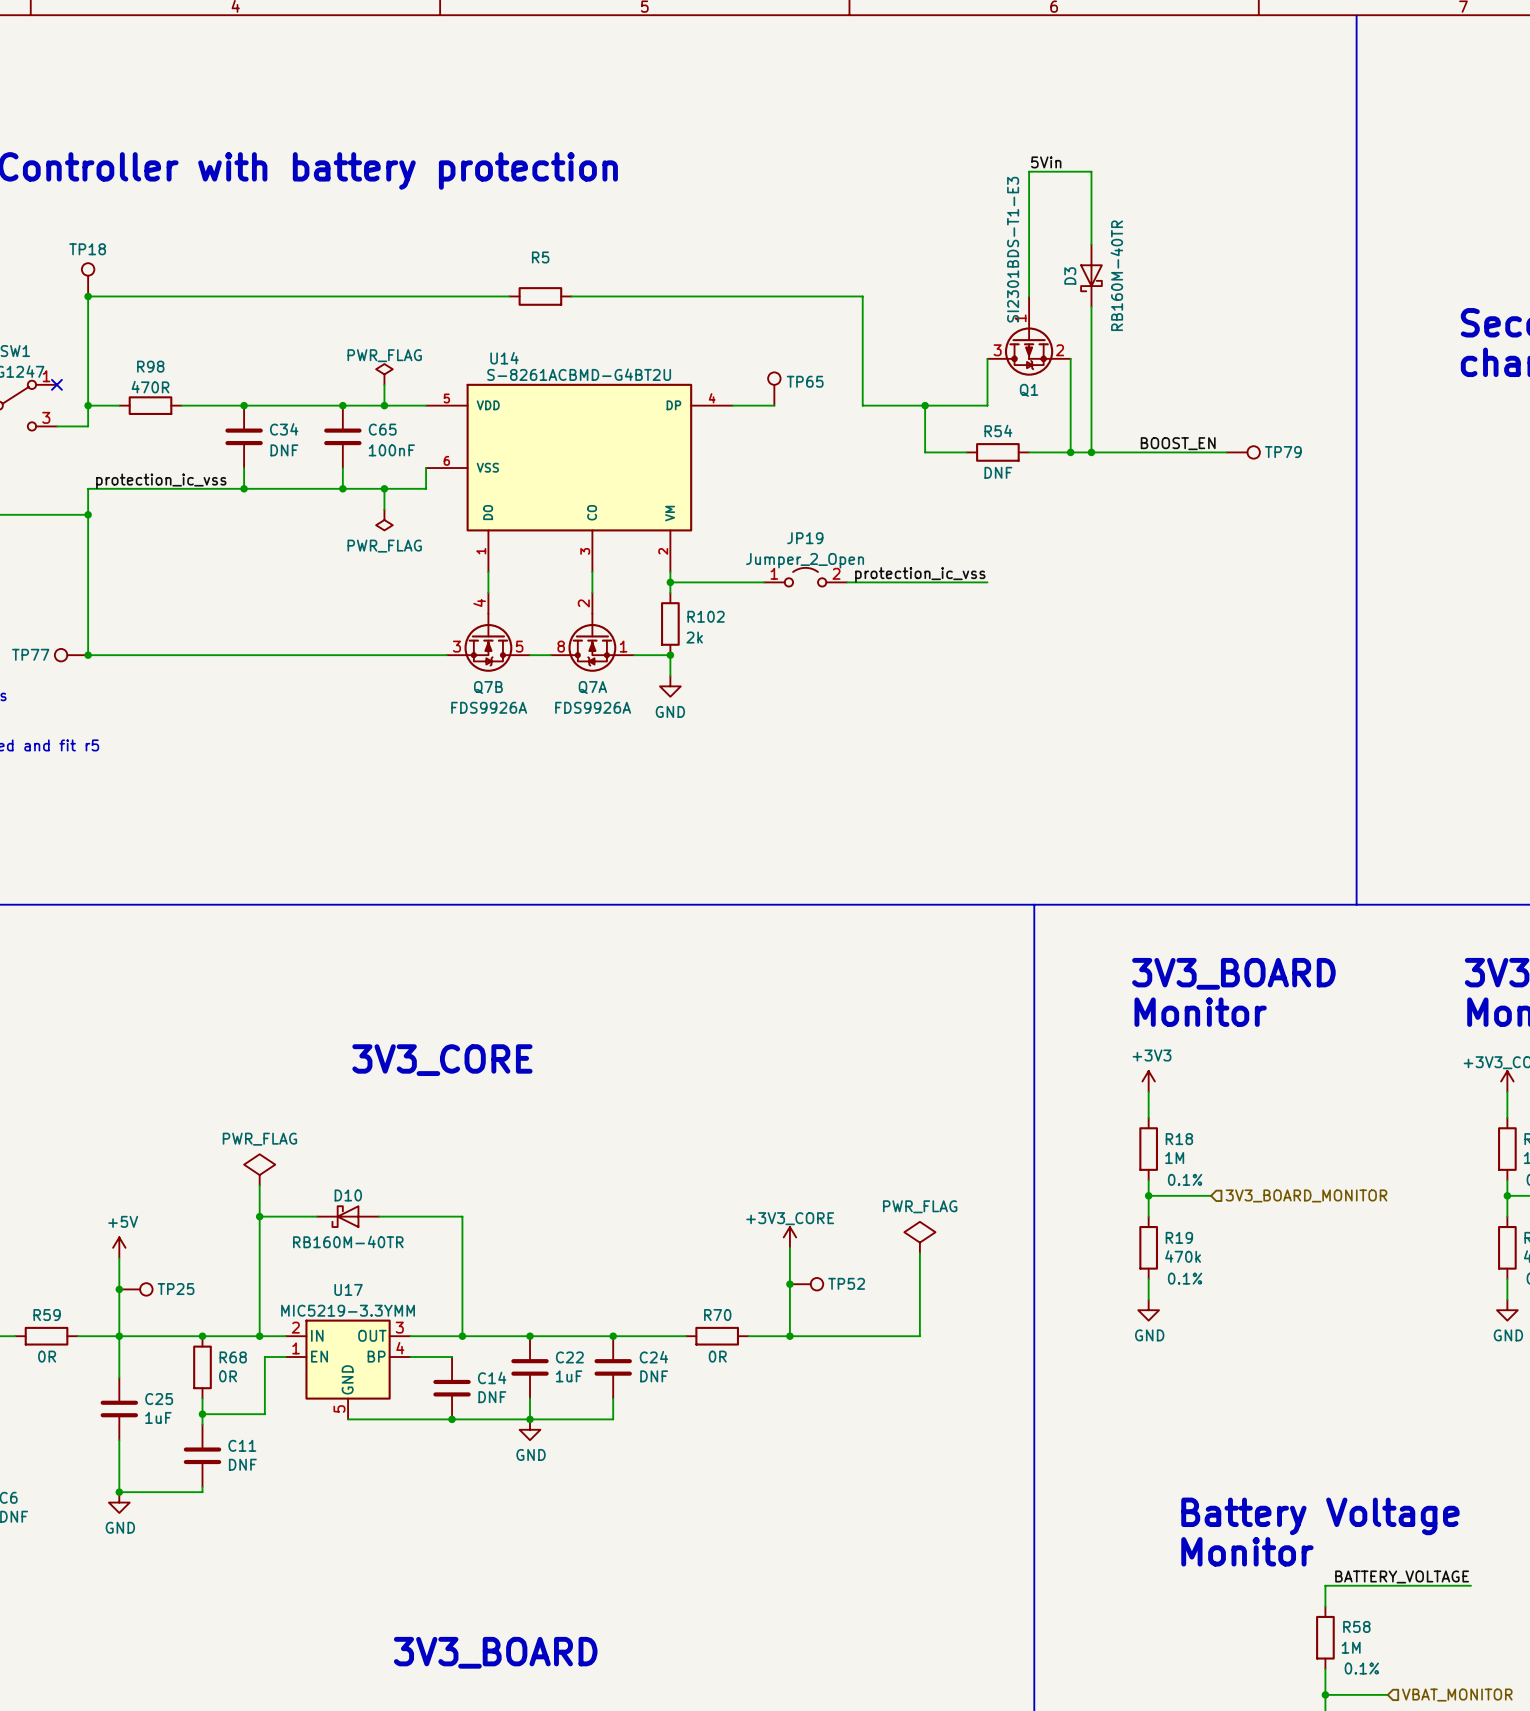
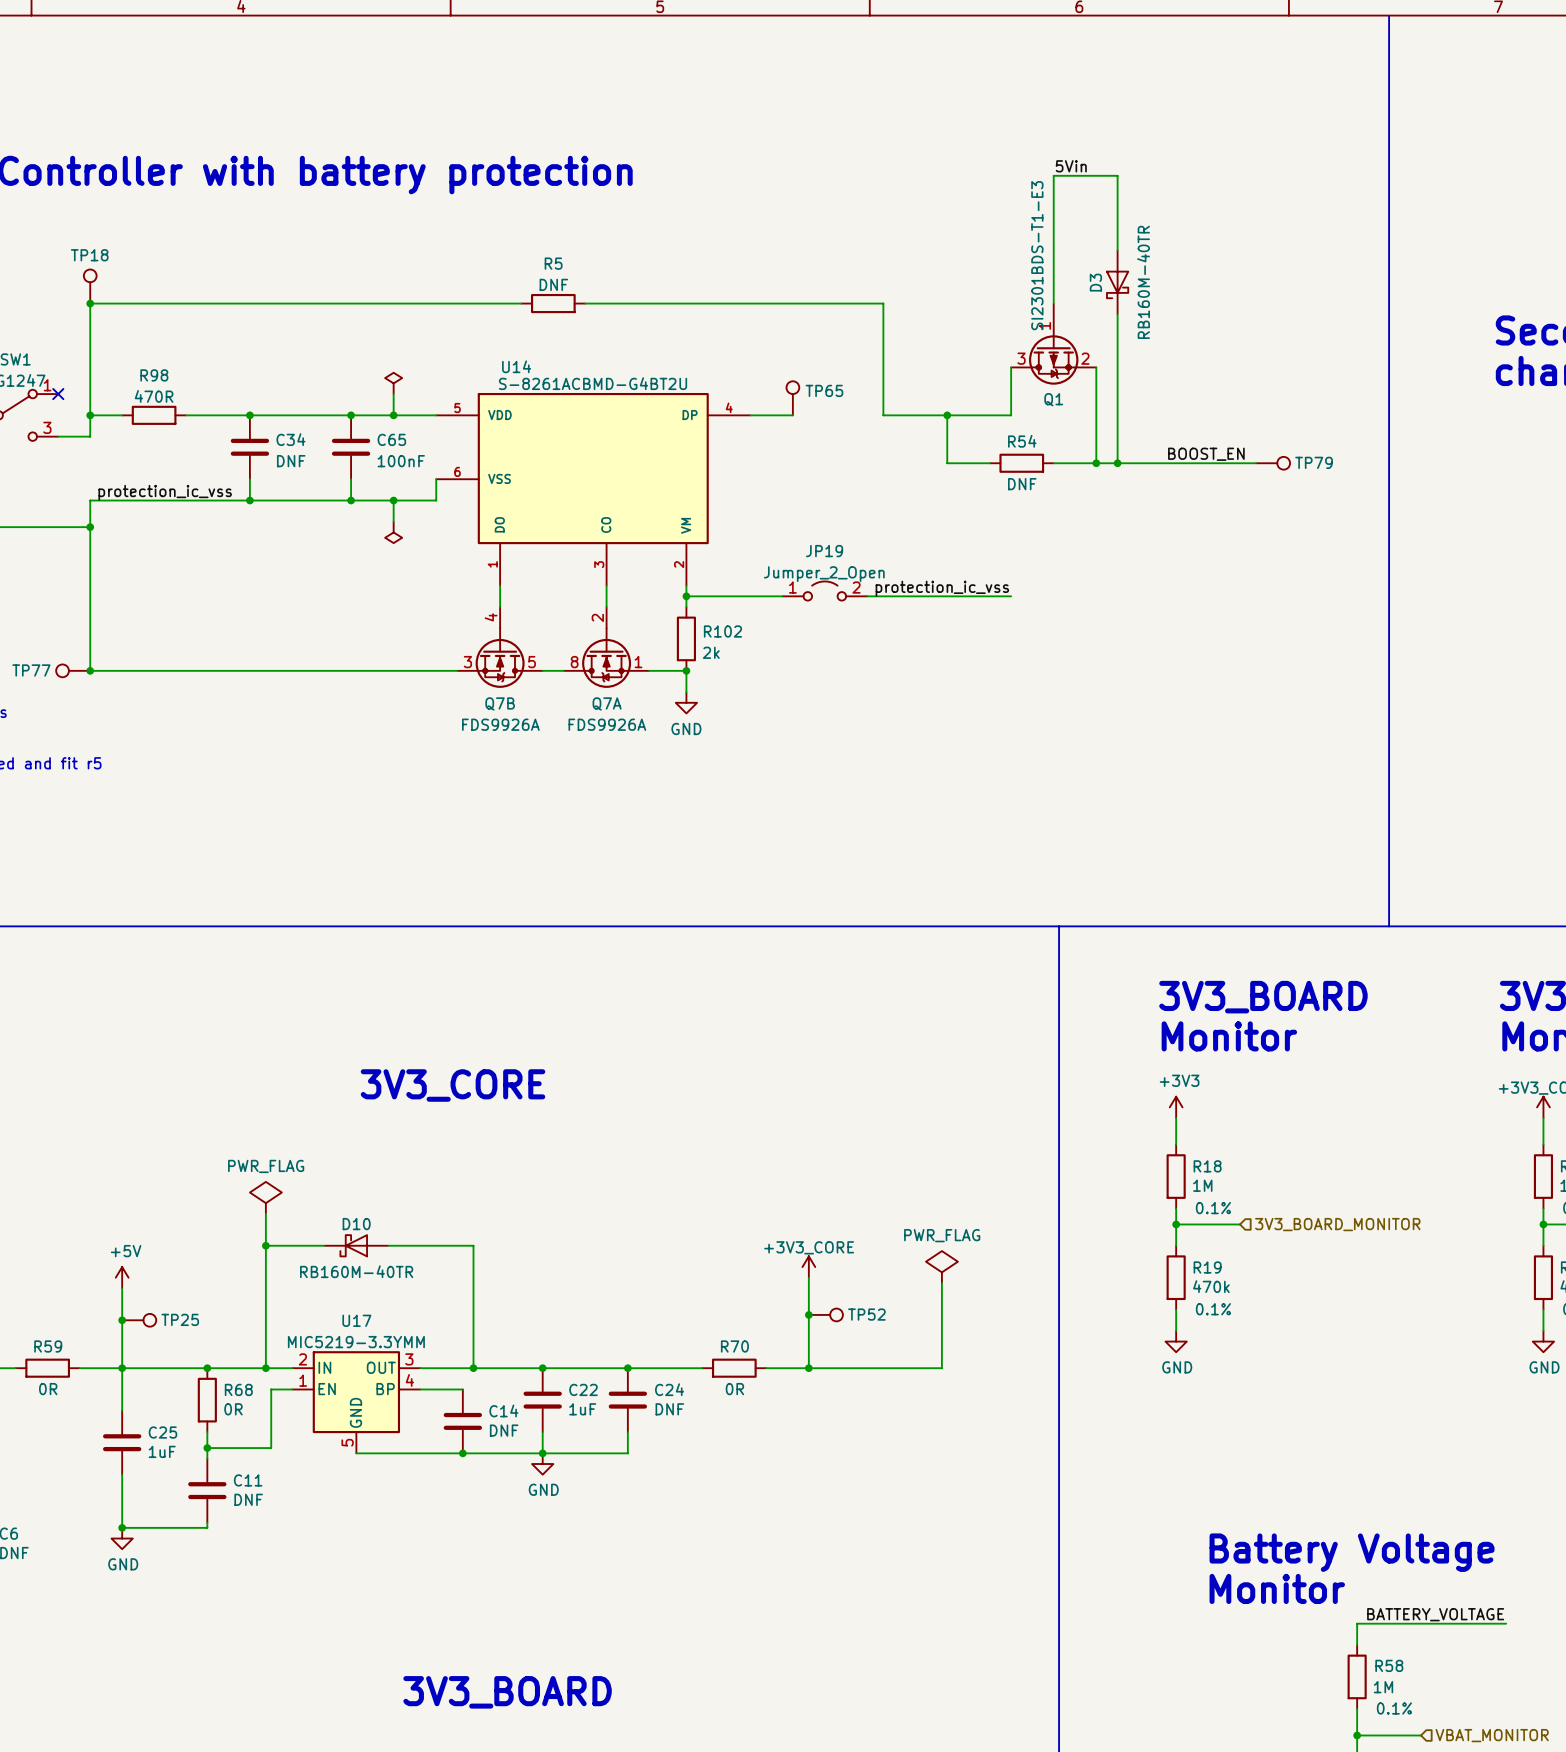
R5 value: none -> DNF (553, 284)
power symbol text: PWR_FLAG (384, 355) -> none
power symbol text: PWR_FLAG (384, 546) -> none

